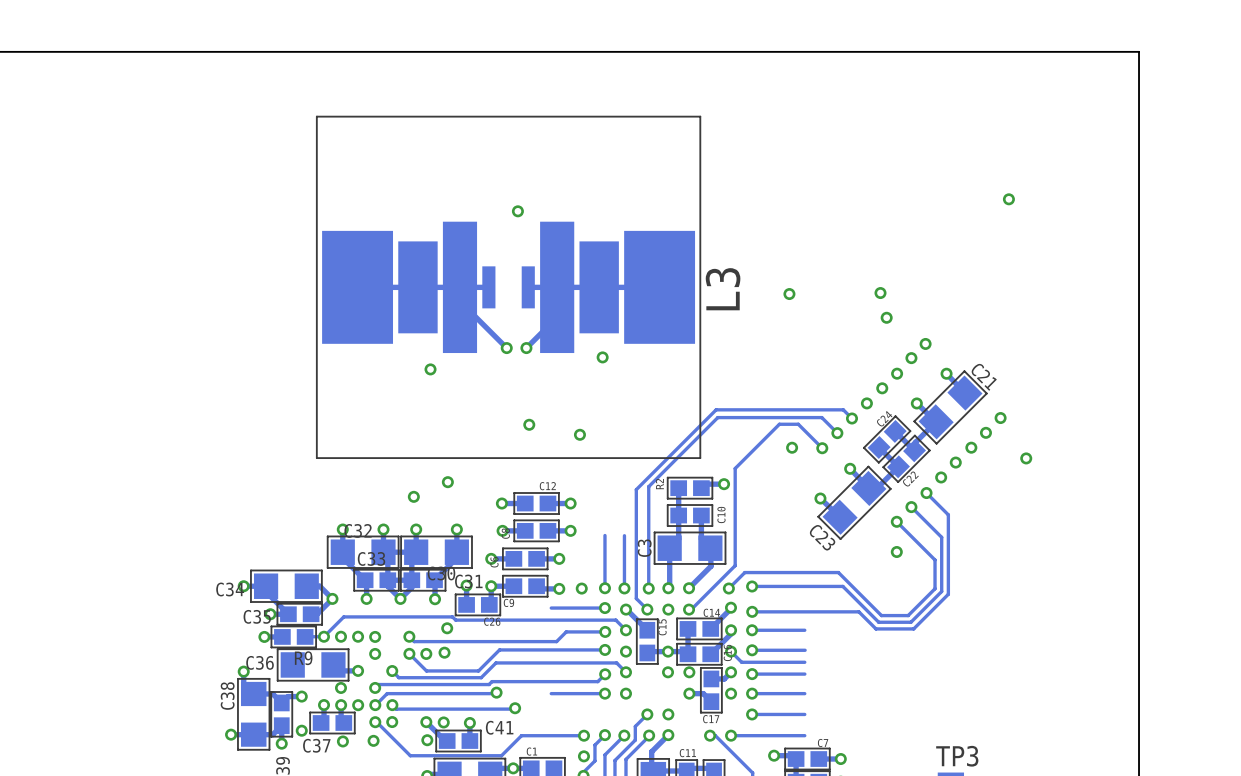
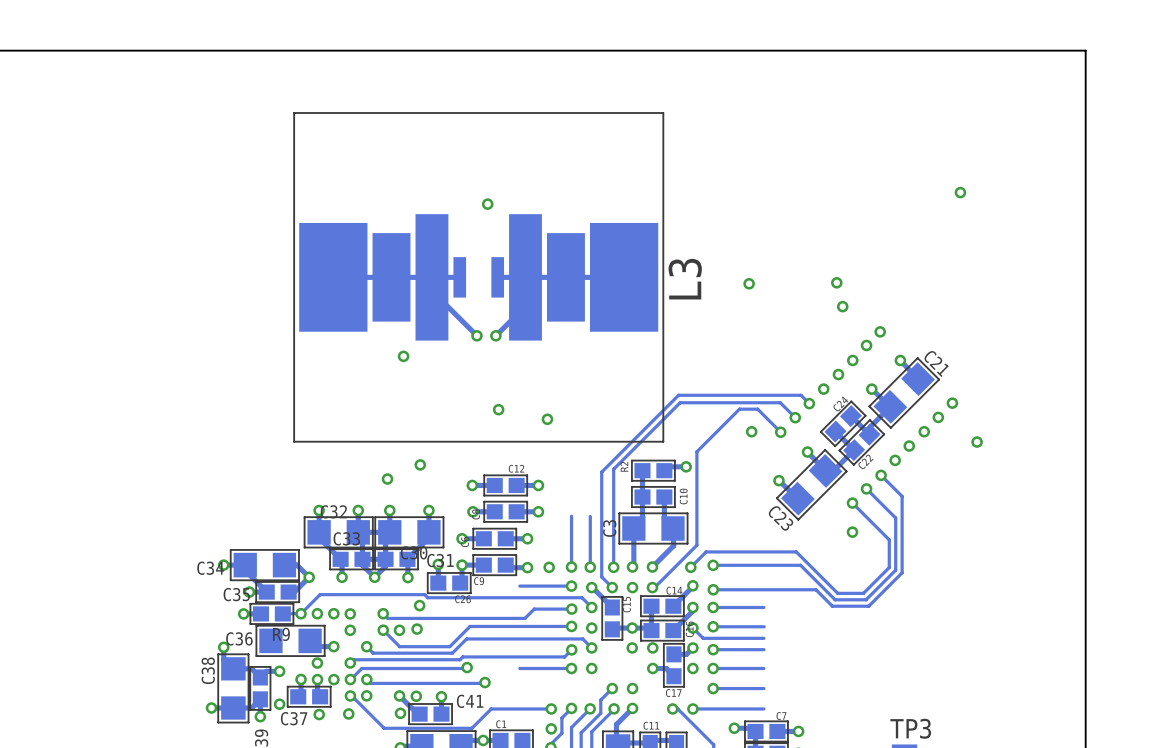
via: (602, 357) -> none

